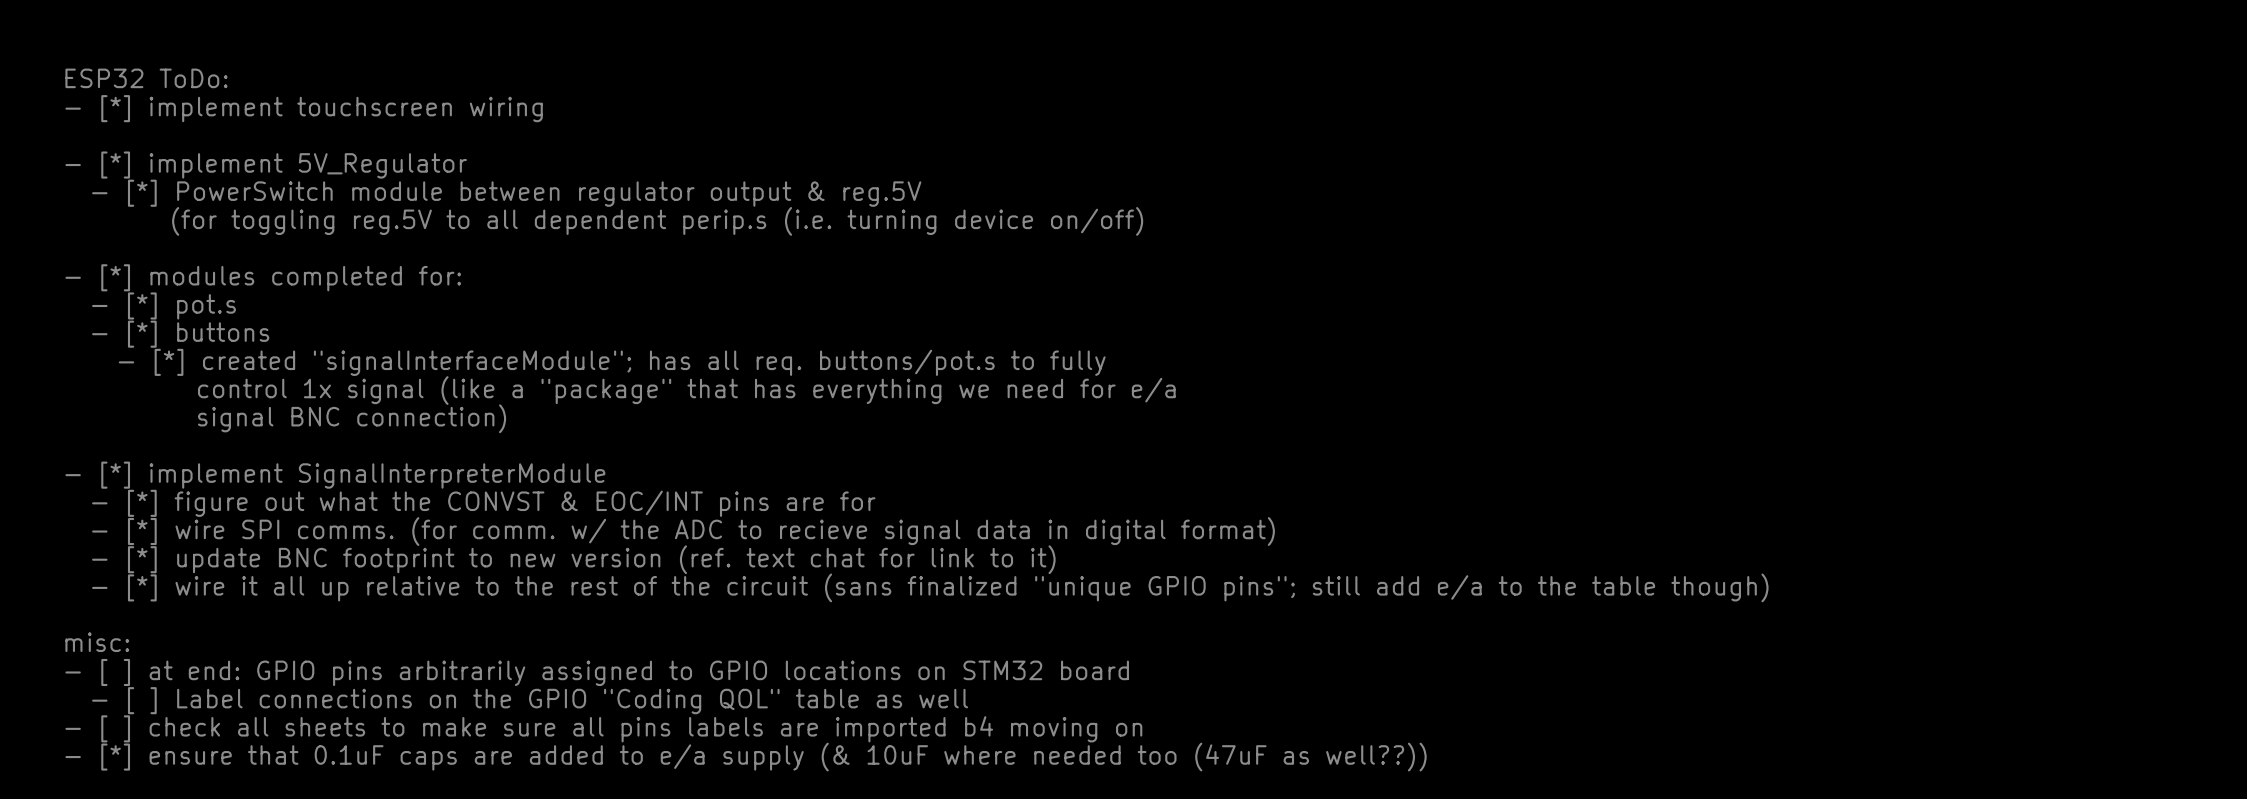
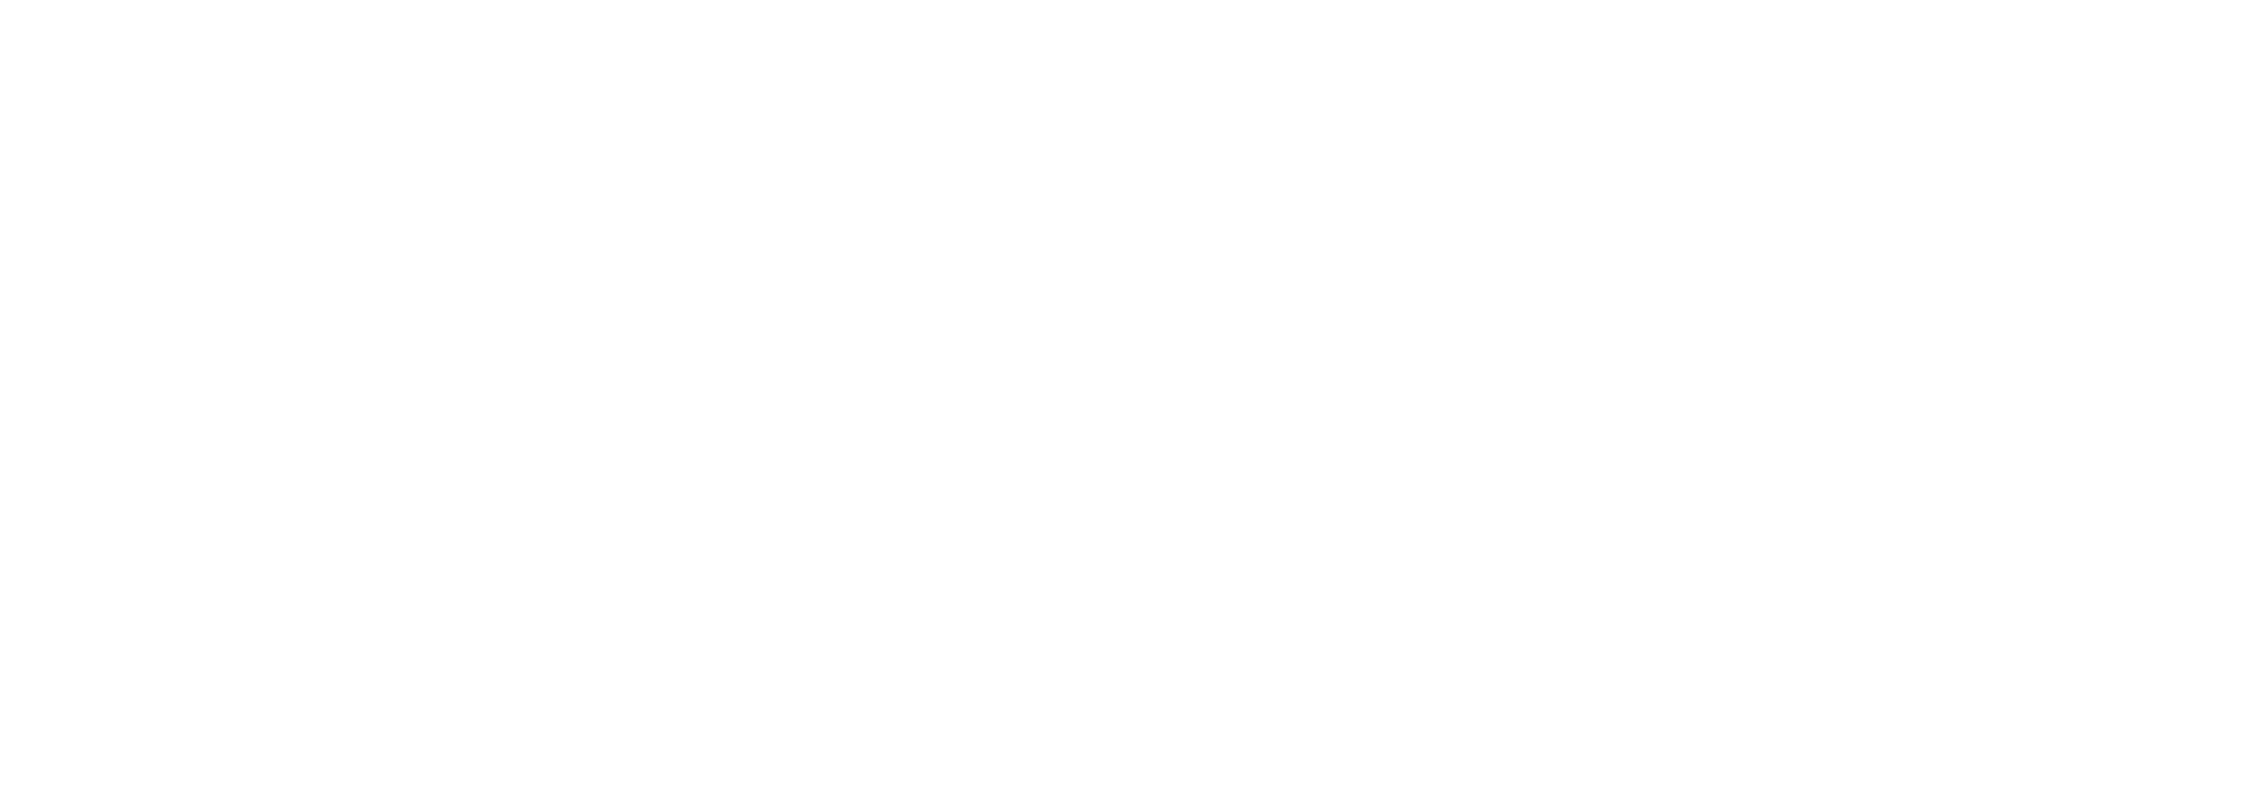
text: ESP32 ToDo: (146, 78) -> none
text: - [*] implement touchscreen wiring (304, 108) -> none
text: - [*] implement 5V_Regulator (266, 165) -> none
text: - [*] PowerSwitch module between regulator output & reg.5V (506, 193) -> none
text: (for toggling reg.5V to all dependent perip.s (i.e. turning device on/off) (657, 221) -> none
text: - [*] modules completed for: (263, 277) -> none
text: - [*] pot.s (164, 305) -> none
text: - [*] buttons (180, 334) -> none
text: - [*] created "signalInterfaceModule"; has all req. buttons/pot.s to fully (612, 362) -> none
text: control 1x signal (like a "package" that has everything we need for e/a (686, 390) -> none
text: signal BNC connection) (352, 418) -> none
text: - [*] implement SignalInterpreterModule (335, 475) -> none
text: - [*] figure out what the CONVST & EOC/INT pins are for (483, 503) -> none
text: - [*] wire SPI comms. (for comm. w/ the ADC to recieve signal data in digital format) (683, 531) -> none
text: - [*] update BNC footprint to new version (ref. text chat for link to it) (573, 559) -> none
text: - [*] wire it all up relative to the rest of the circuit (sans finalized "unique GPIO pins"; still add e/a to the table though) (930, 587) -> none
text: misc: (97, 642) -> none
text: - [ ] at end: GPIO pins arbitrarily assigned to GPIO locations on STM32 board (597, 672) -> none
text: - [ ] Label connections on the GPIO "Coding QOL" table as well (530, 700) -> none
text: - [ ] check all sheets to make sure all pins labels are imported b4 moving on (603, 728) -> none
text: - [*] ensure that 0.1uF caps are added to e/a supply (& 10uF where needed too (47uF as well??)) (746, 757) -> none

